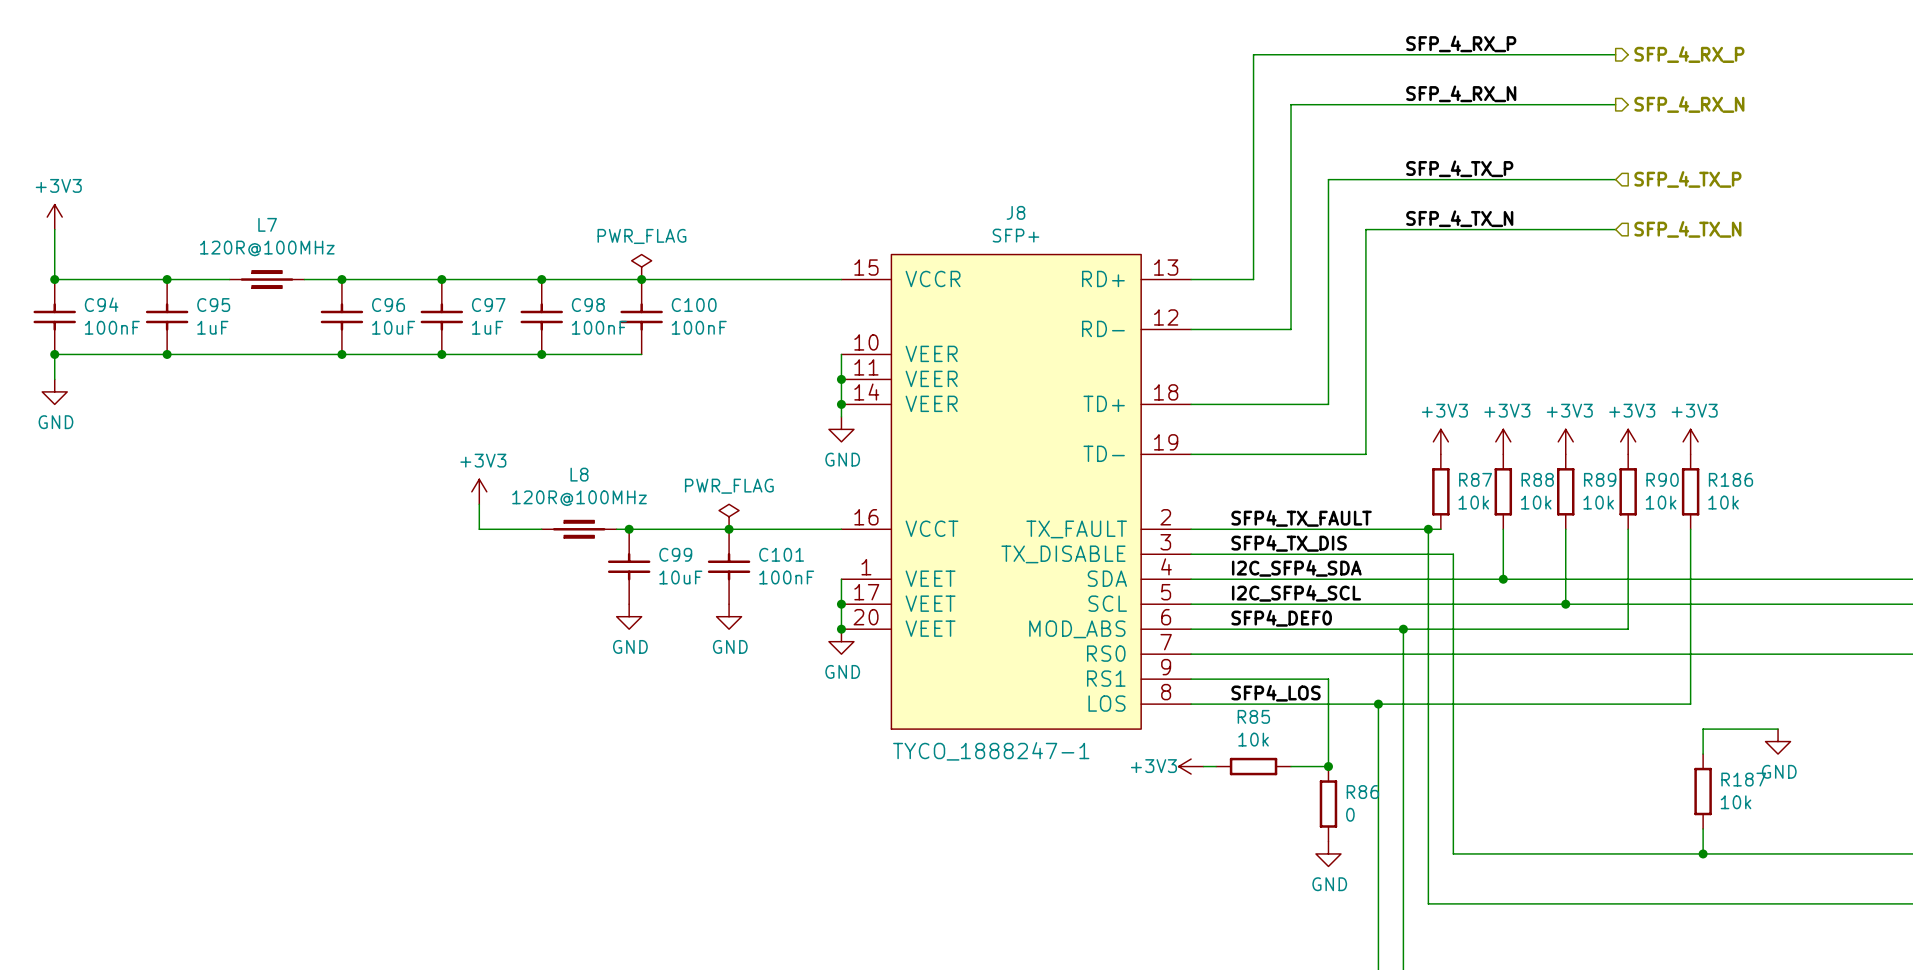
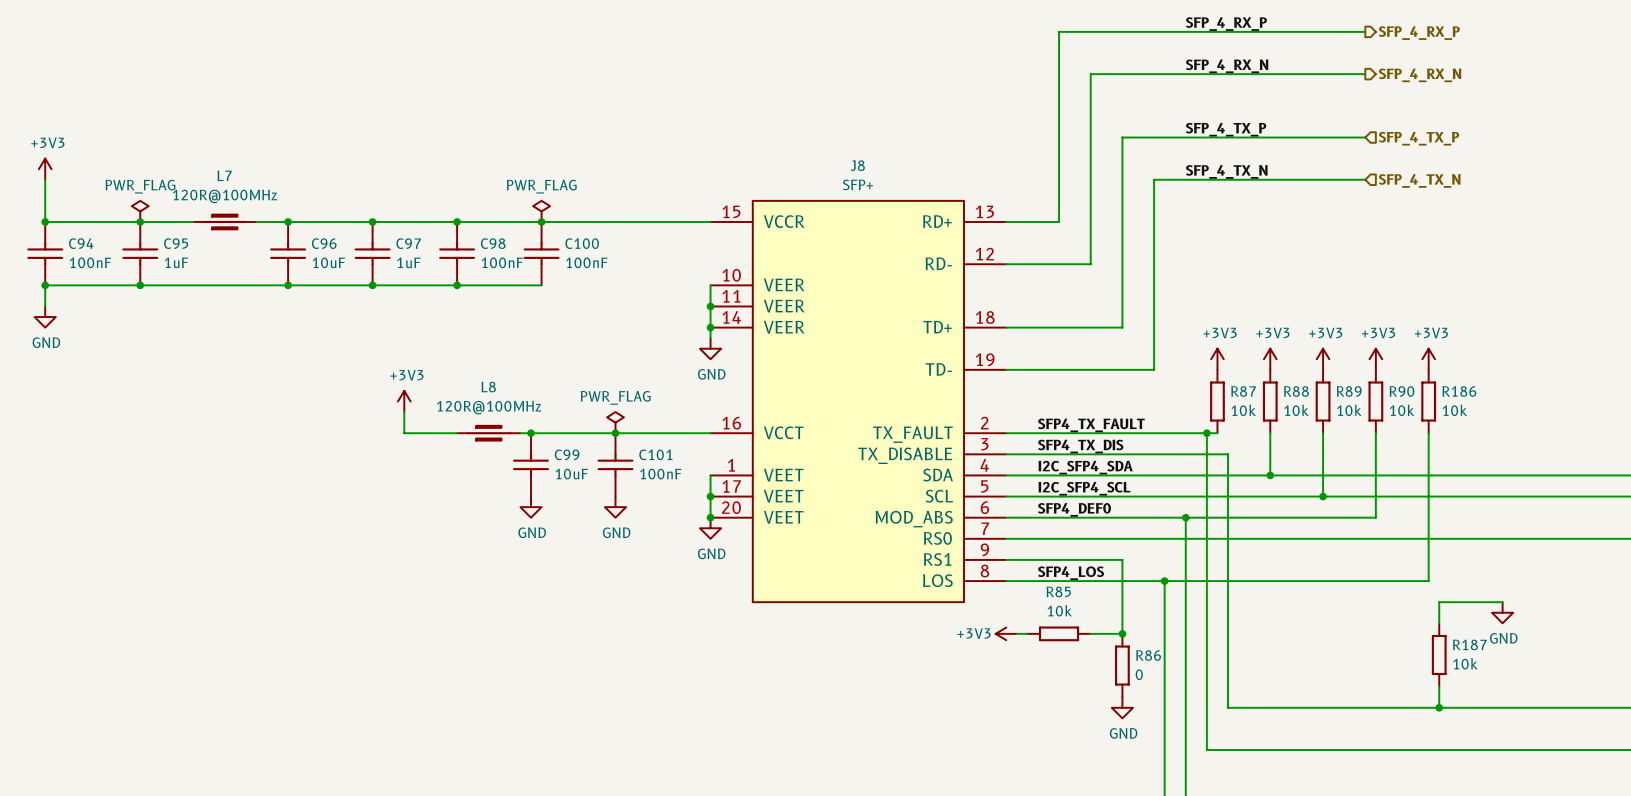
power symbol: none -> PWR_FLAG (140, 211)
J8 value: TYCO_1888247-1 (991, 751) -> none

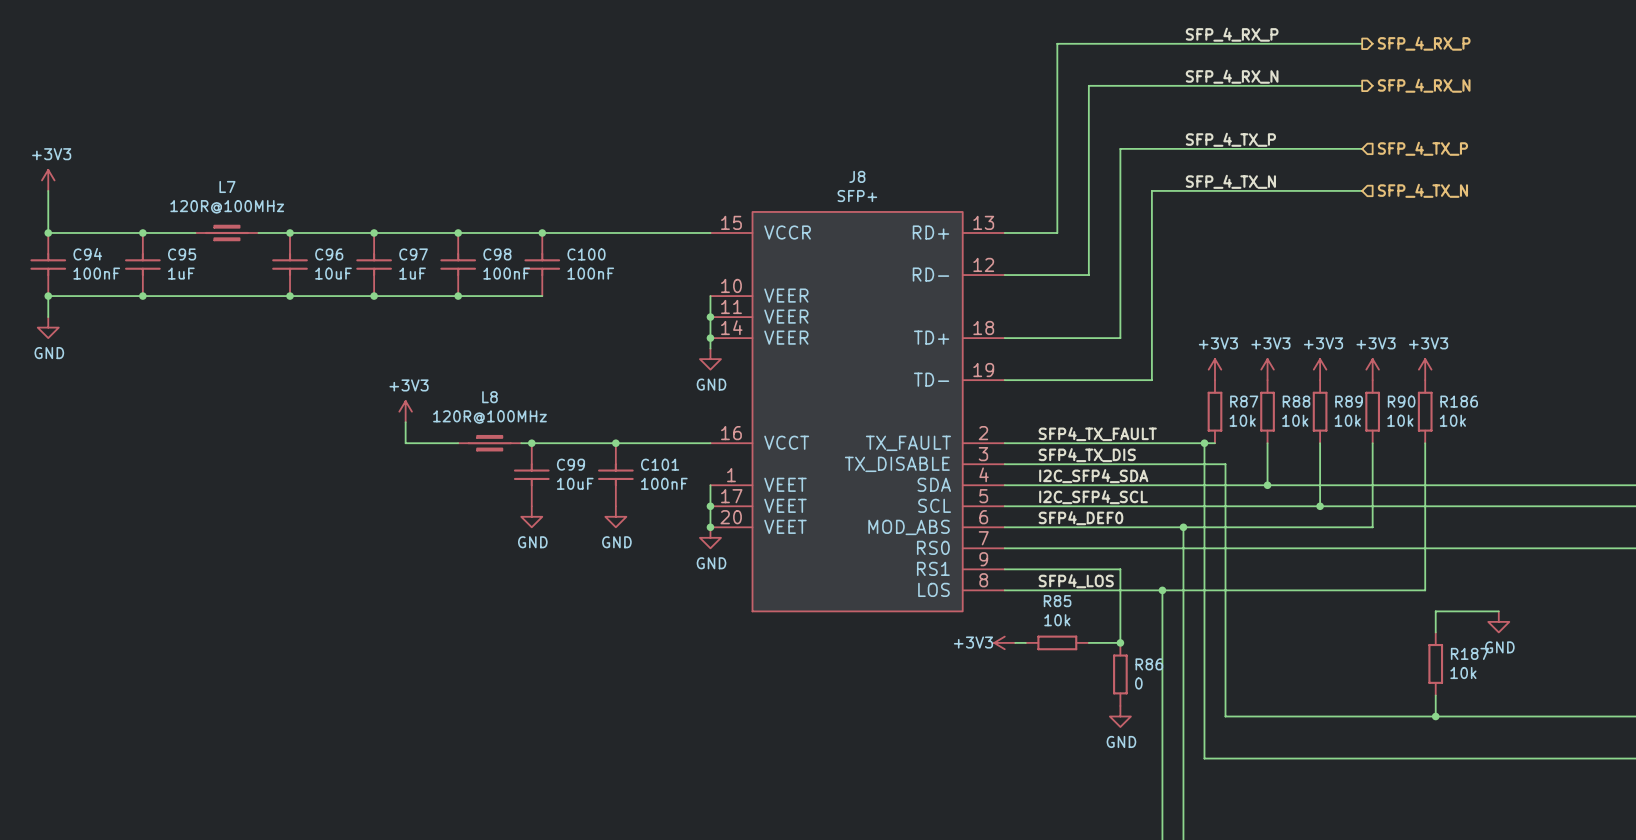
power symbol: PWR_FLAG (140, 211) -> none
power symbol: PWR_FLAG (541, 211) -> none
power symbol: PWR_FLAG (615, 422) -> none

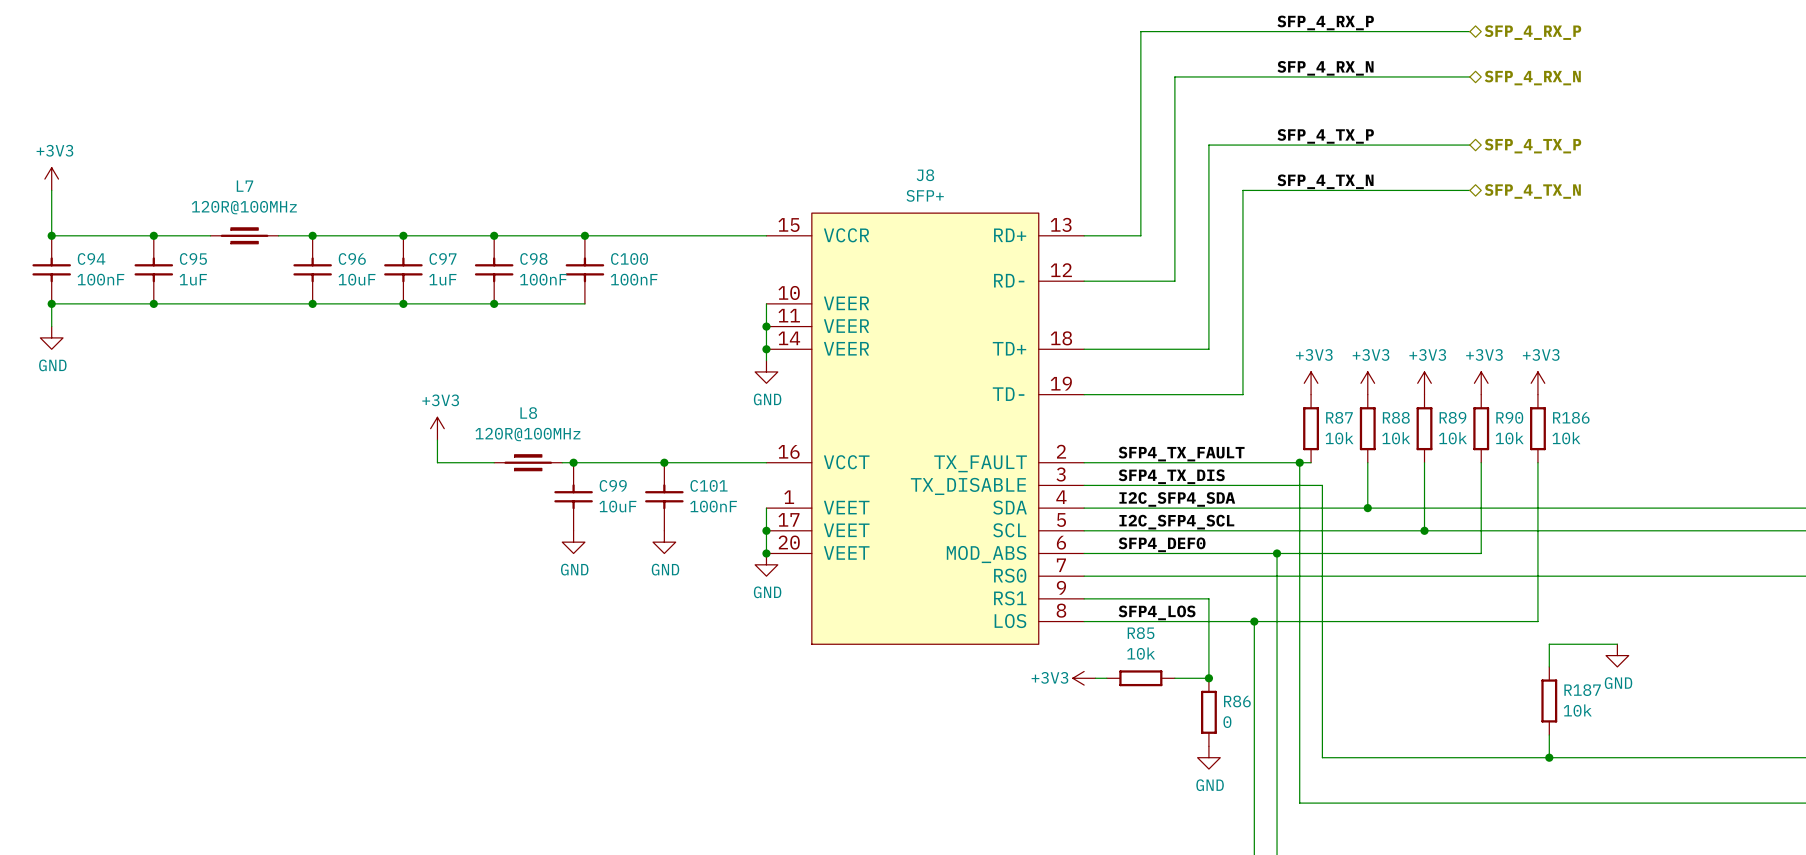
hierarchical label shape: output (1424, 43) -> bidirectional (1532, 32)
hierarchical label shape: output (1424, 85) -> bidirectional (1532, 78)
hierarchical label shape: input (1422, 148) -> bidirectional (1532, 146)
hierarchical label shape: input (1422, 190) -> bidirectional (1532, 191)

